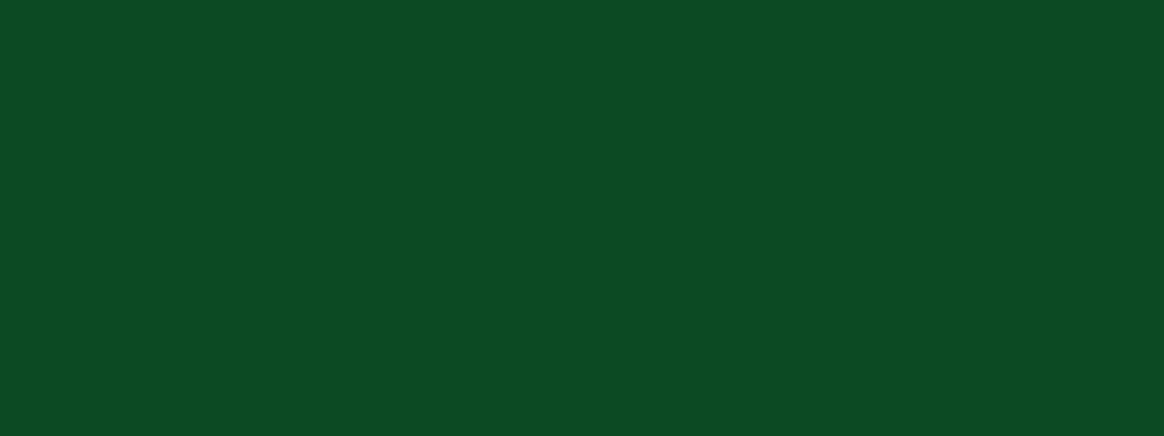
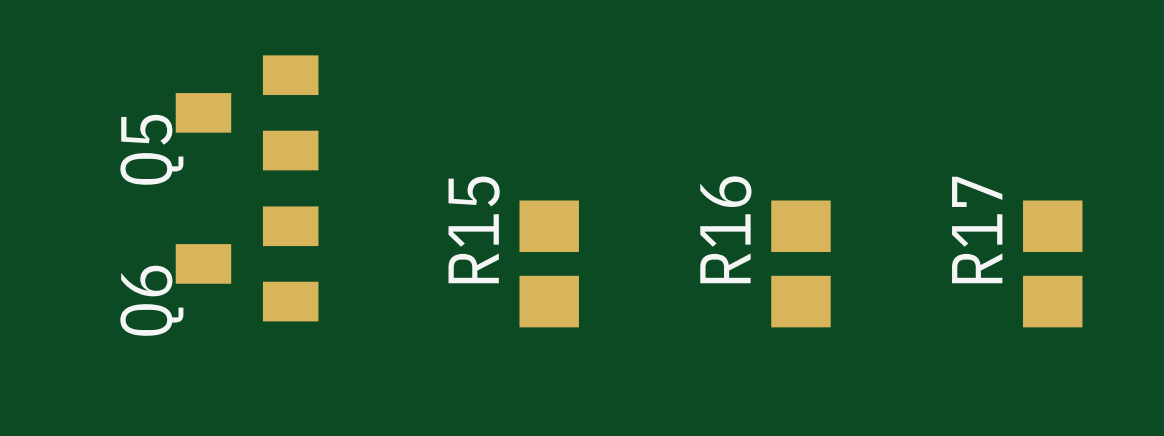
Q5: none -> (247, 112)
Q6: none -> (247, 263)
R15: none -> (549, 263)
R16: none -> (800, 263)
R17: none -> (1052, 263)

